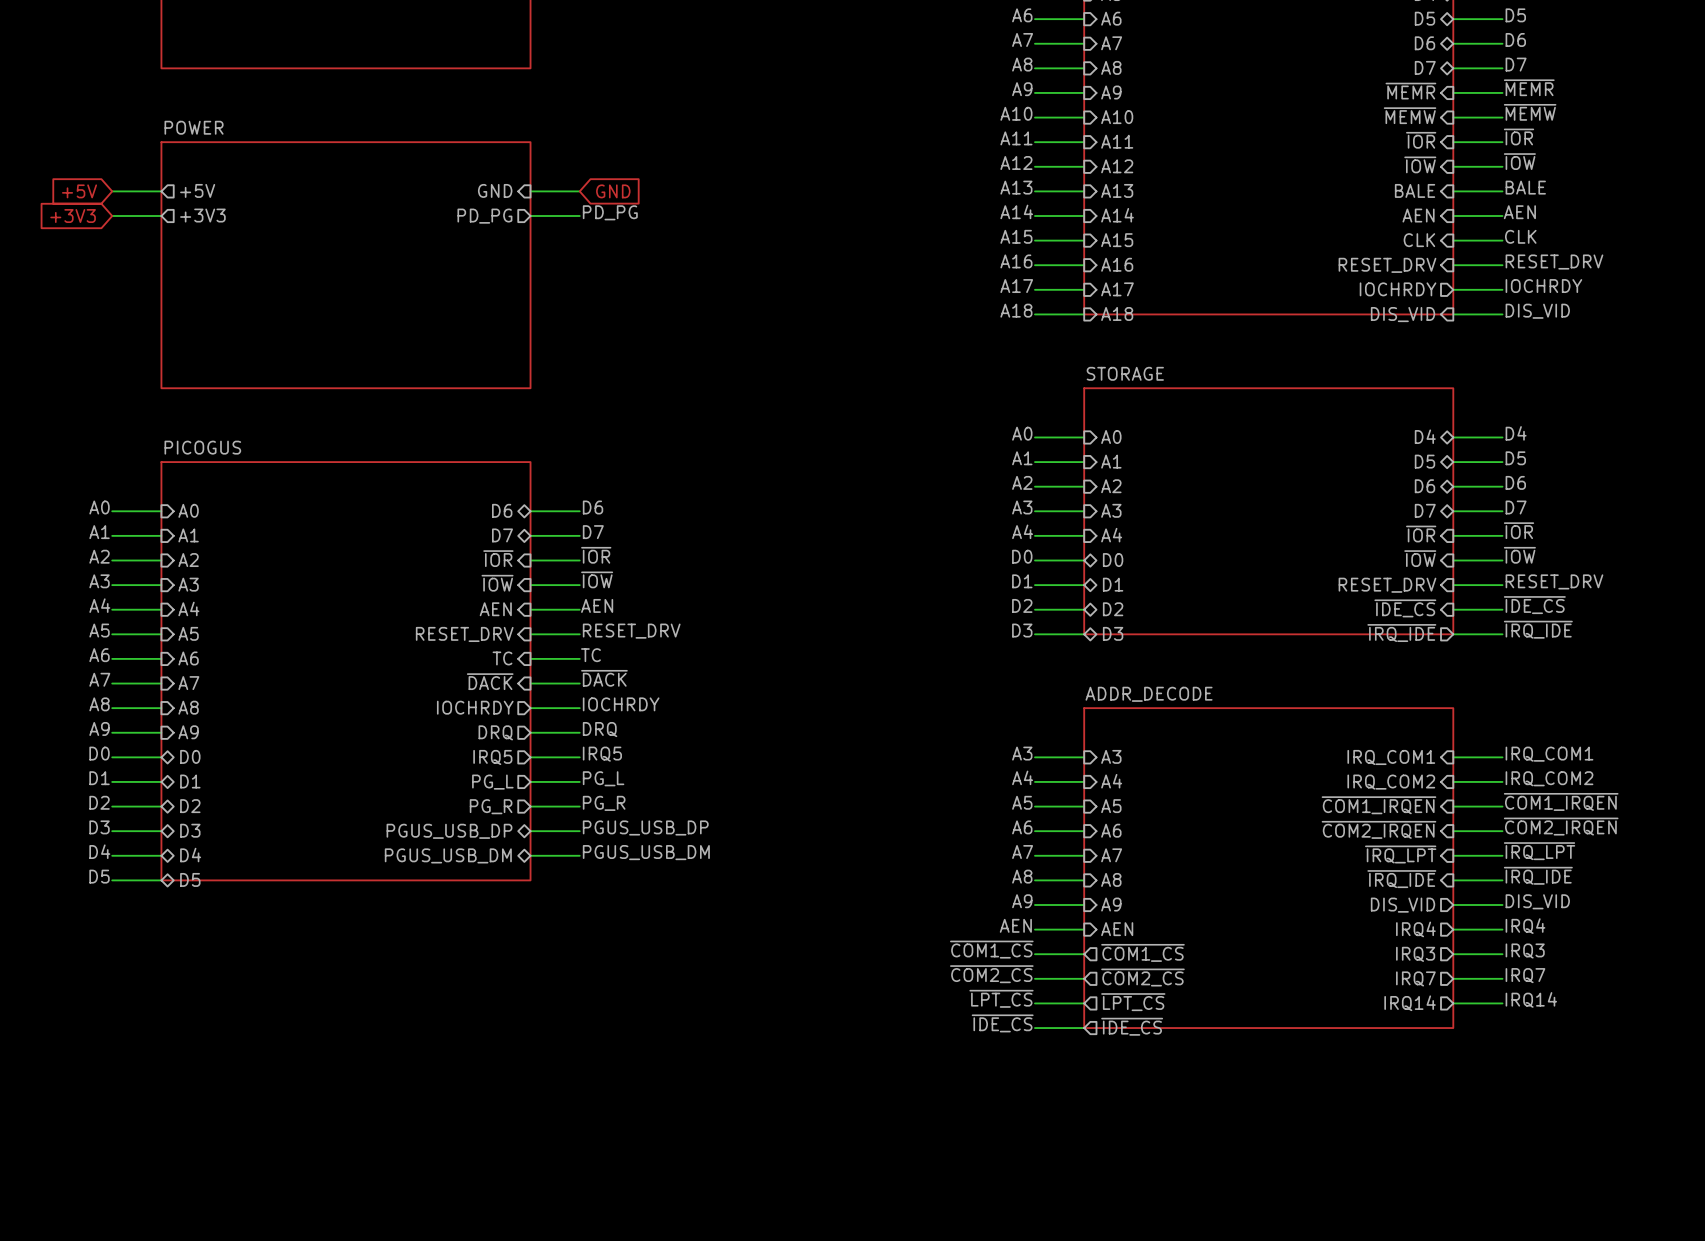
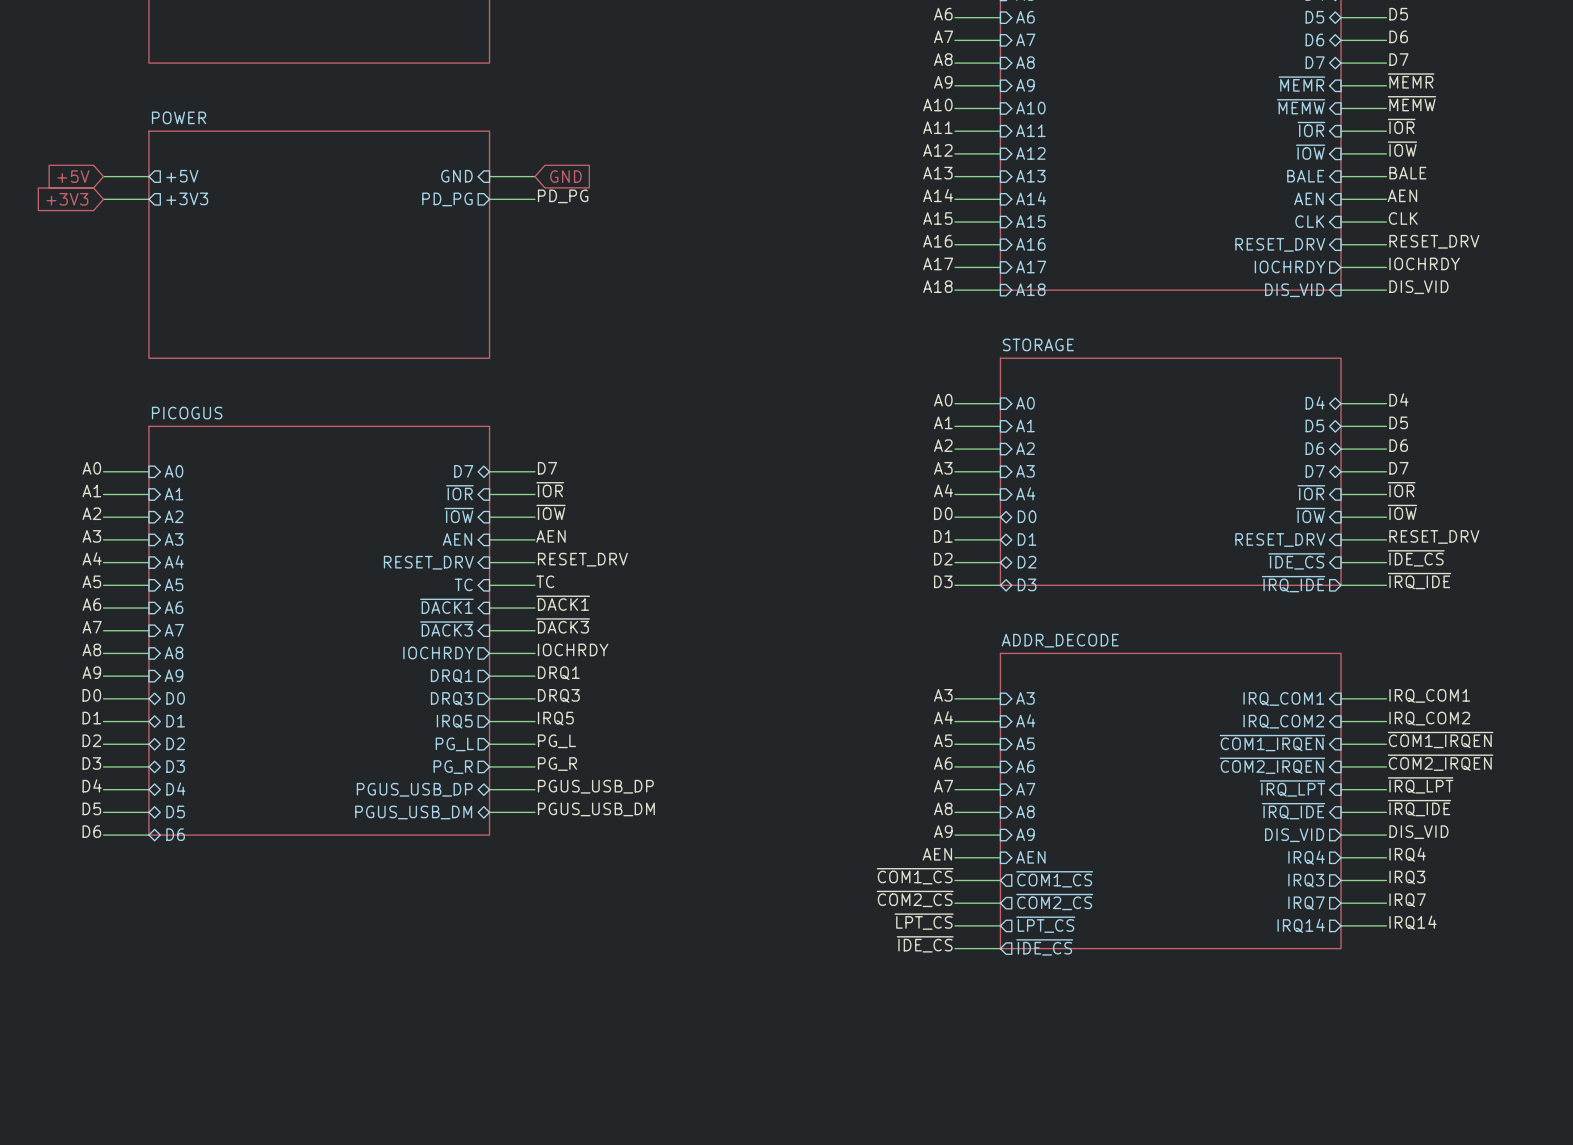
label: D6 (593, 507) -> D7 (547, 468)
sheet pin: D6 (502, 510) -> D7 (463, 471)
label: D7 (593, 532) -> ~{IOR} (550, 489)
sheet pin shape: bidirectional (502, 535) -> input (459, 492)
sheet pin: D7 (502, 535) -> ~{IOR} (459, 492)
label: ~{IOR} (596, 555) -> ~{IOW} (550, 512)
sheet pin: ~{IOR} (498, 558) -> ~{IOW} (459, 515)
label: ~{IOW} (597, 579) -> AEN (550, 536)
sheet pin: ~{IOW} (497, 583) -> AEN (457, 539)
label: AEN (597, 605) -> RESET_DRV (582, 559)
sheet pin: AEN (495, 609) -> RESET_DRV (428, 562)
label: RESET_DRV (631, 631) -> TC (545, 581)
sheet pin: RESET_DRV (464, 634) -> TC (463, 584)
label: TC (590, 655) -> ~{DACK1} (563, 603)
sheet pin: TC (502, 658) -> ~{DACK1} (446, 606)
sheet PICOGUS: (345, 671) -> none
label: ~{DACK} (604, 678) -> ~{DACK3} (563, 625)
sheet pin: ~{DACK} (490, 681) -> ~{DACK3} (446, 628)
sheet PICOGUS: none -> (319, 630)
label: DRQ (600, 729) -> DRQ1 (558, 673)
sheet pin: DRQ (495, 732) -> DRQ1 (451, 676)
label: IRQ5 (602, 754) -> DRQ3 (558, 695)
sheet pin: IRQ5 (492, 757) -> DRQ3 (451, 698)
label: PG_L (603, 778) -> IRQ5 (555, 718)
sheet pin: PG_L (492, 782) -> IRQ5 (454, 721)
label: PG_R (604, 803) -> PG_L (556, 741)
sheet pin: PG_R (491, 806) -> PG_L (454, 744)
label: PGUS_USB_DP (645, 827) -> PG_R (557, 764)
sheet pin shape: bidirectional (449, 831) -> output (453, 767)
sheet pin: PGUS_USB_DP (449, 831) -> PG_R (453, 767)
label: PGUS_USB_DM (646, 852) -> PGUS_USB_DP (595, 786)
sheet pin: PGUS_USB_DM (448, 855) -> PGUS_USB_DP (414, 789)
label: none -> PGUS_USB_DM (596, 809)
sheet pin: none -> PGUS_USB_DM (413, 812)
wire: none -> (489, 812) (534, 812)
label: none -> D6 (91, 831)
sheet pin: none -> D6 (175, 834)
wire: none -> (103, 835) (148, 835)

